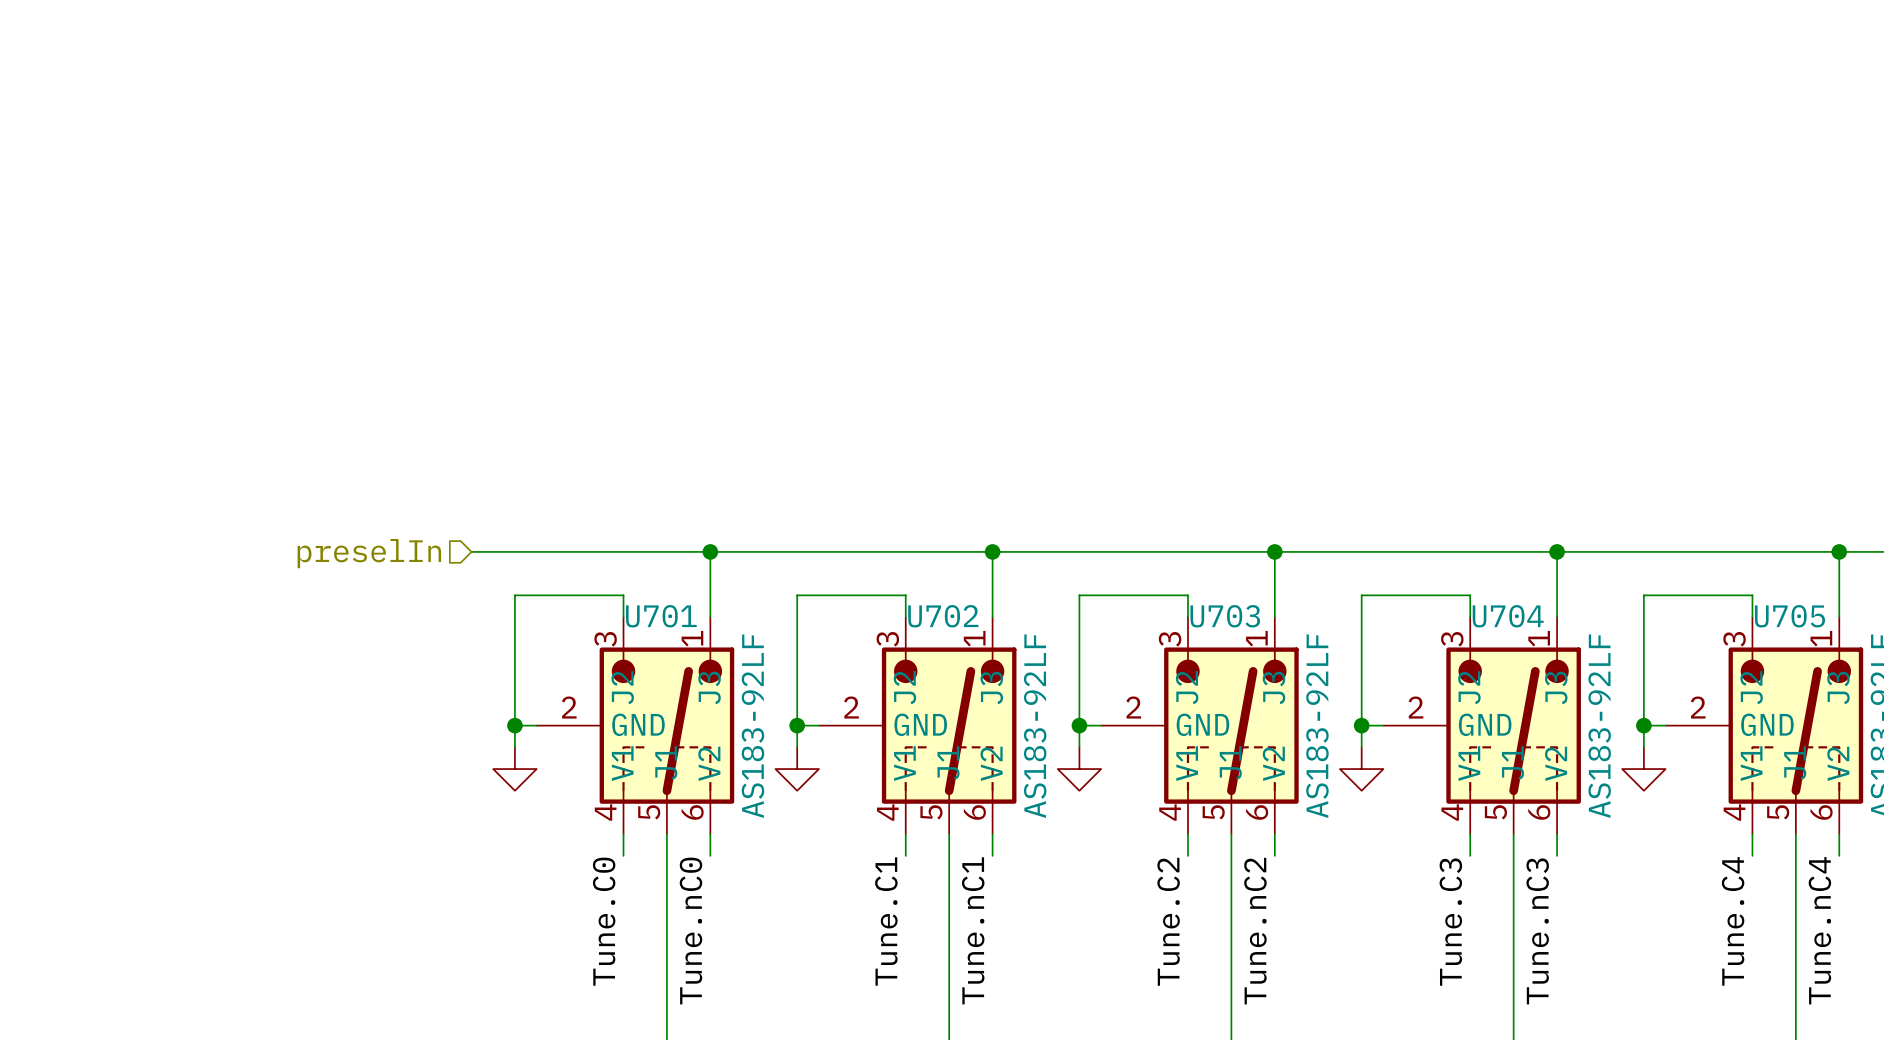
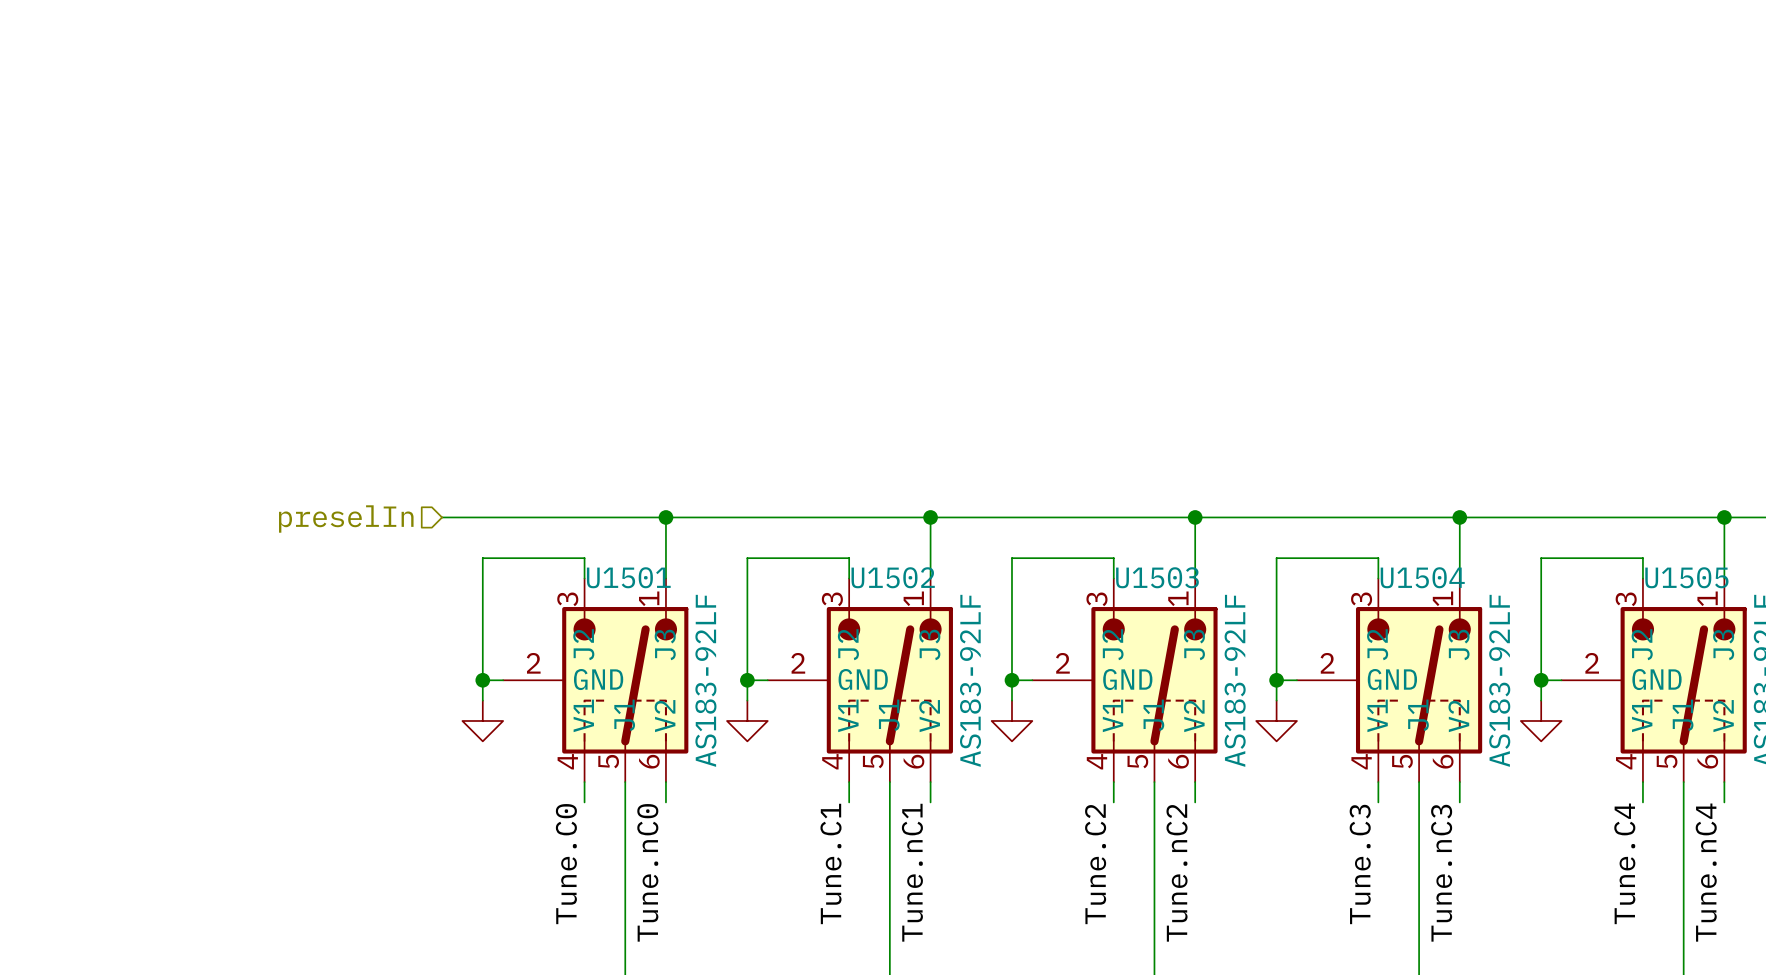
U701 name: U701 (661, 616) -> U1501 (628, 577)
U702 name: U702 (943, 616) -> U1502 (893, 577)
U703 name: U703 (1225, 616) -> U1503 (1157, 577)
U704 name: U704 (1508, 616) -> U1504 (1422, 577)
U705 name: U705 (1789, 616) -> U1505 (1686, 577)

